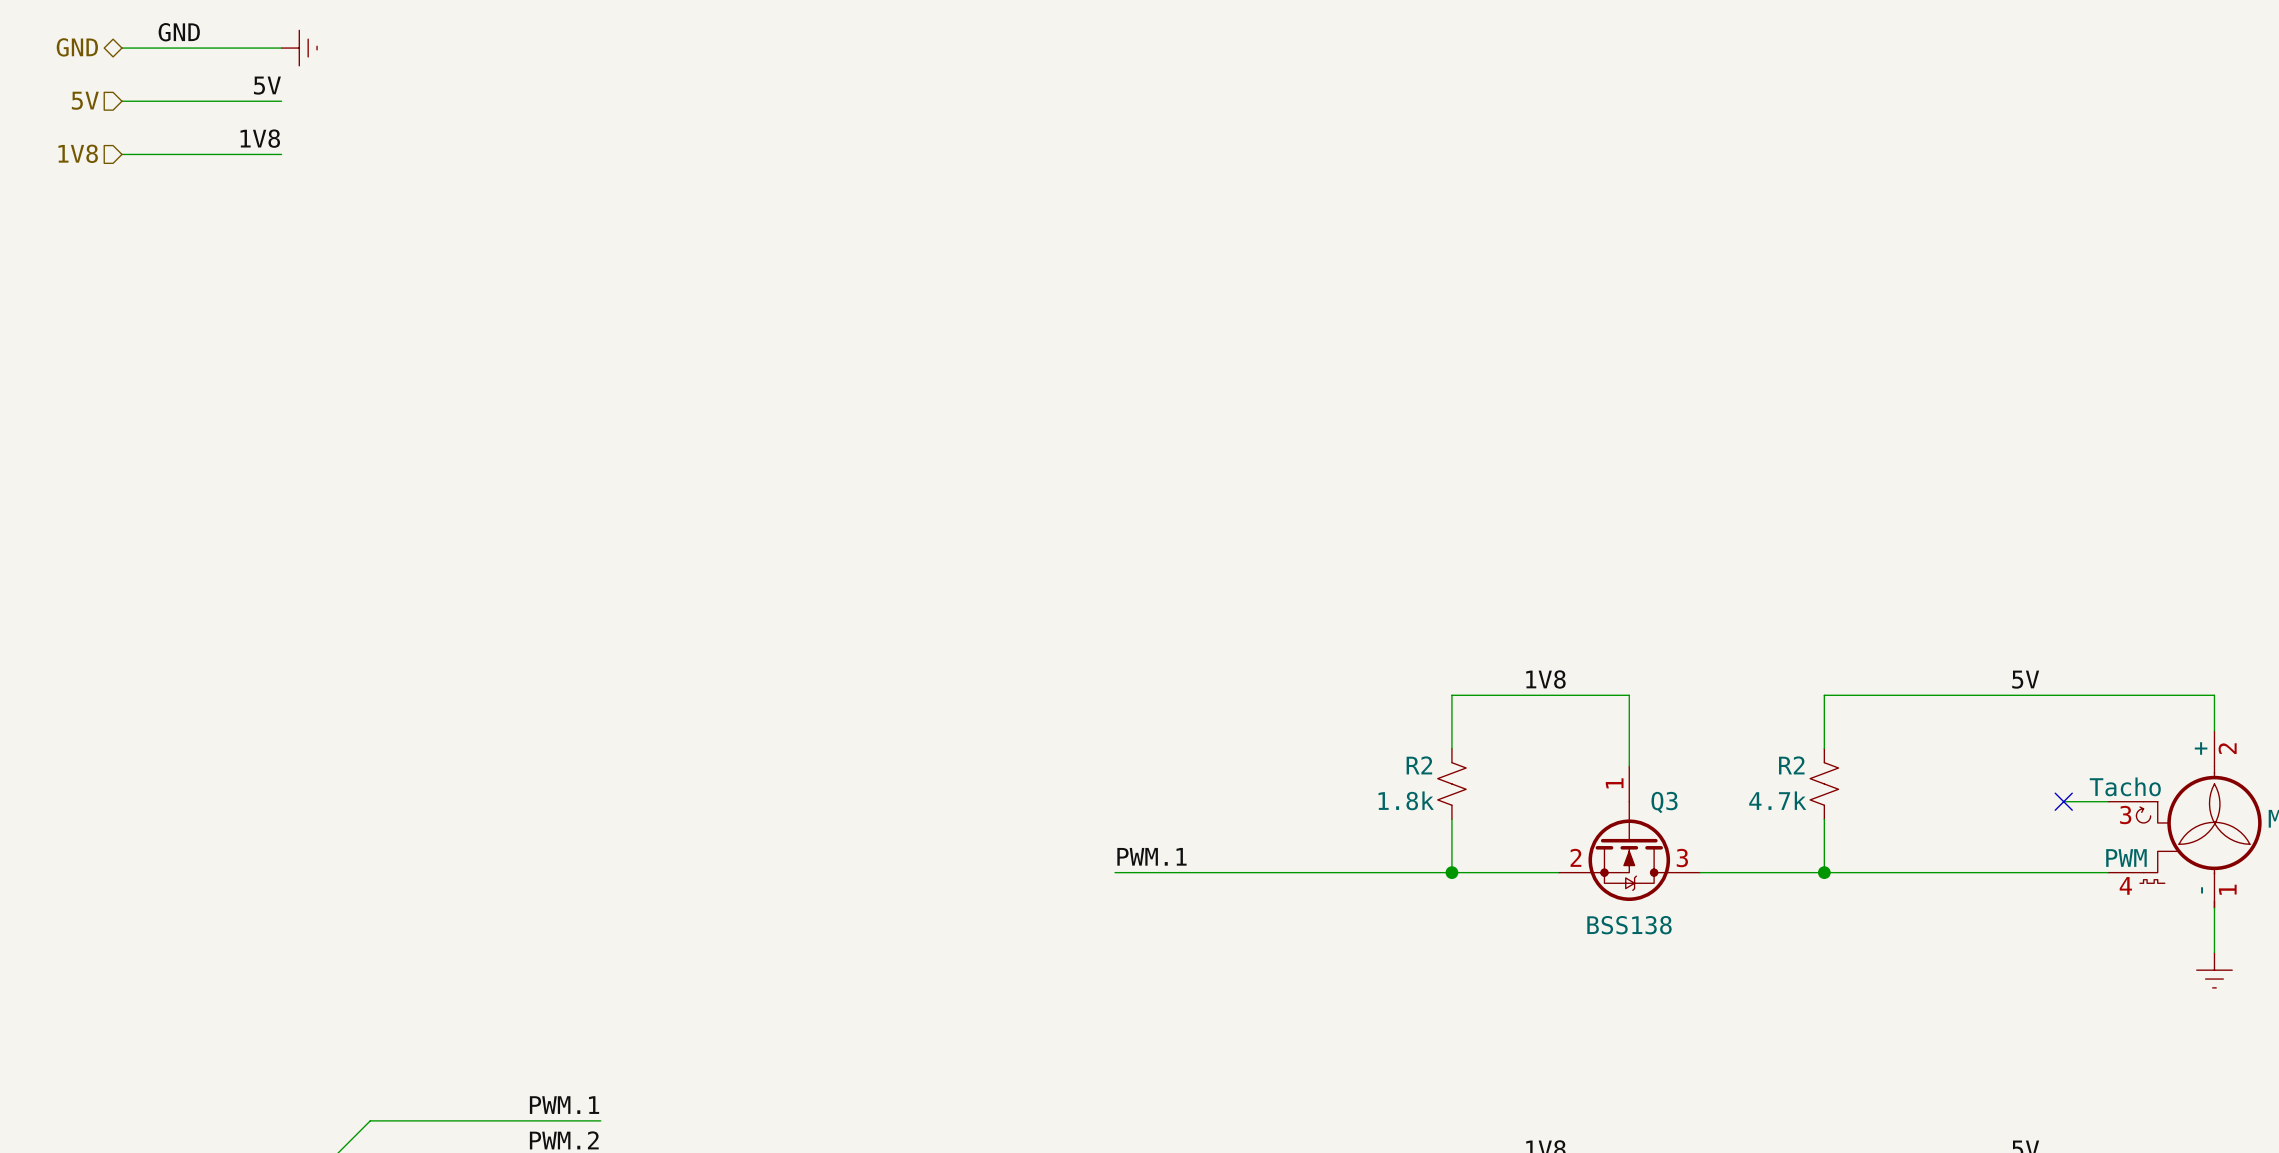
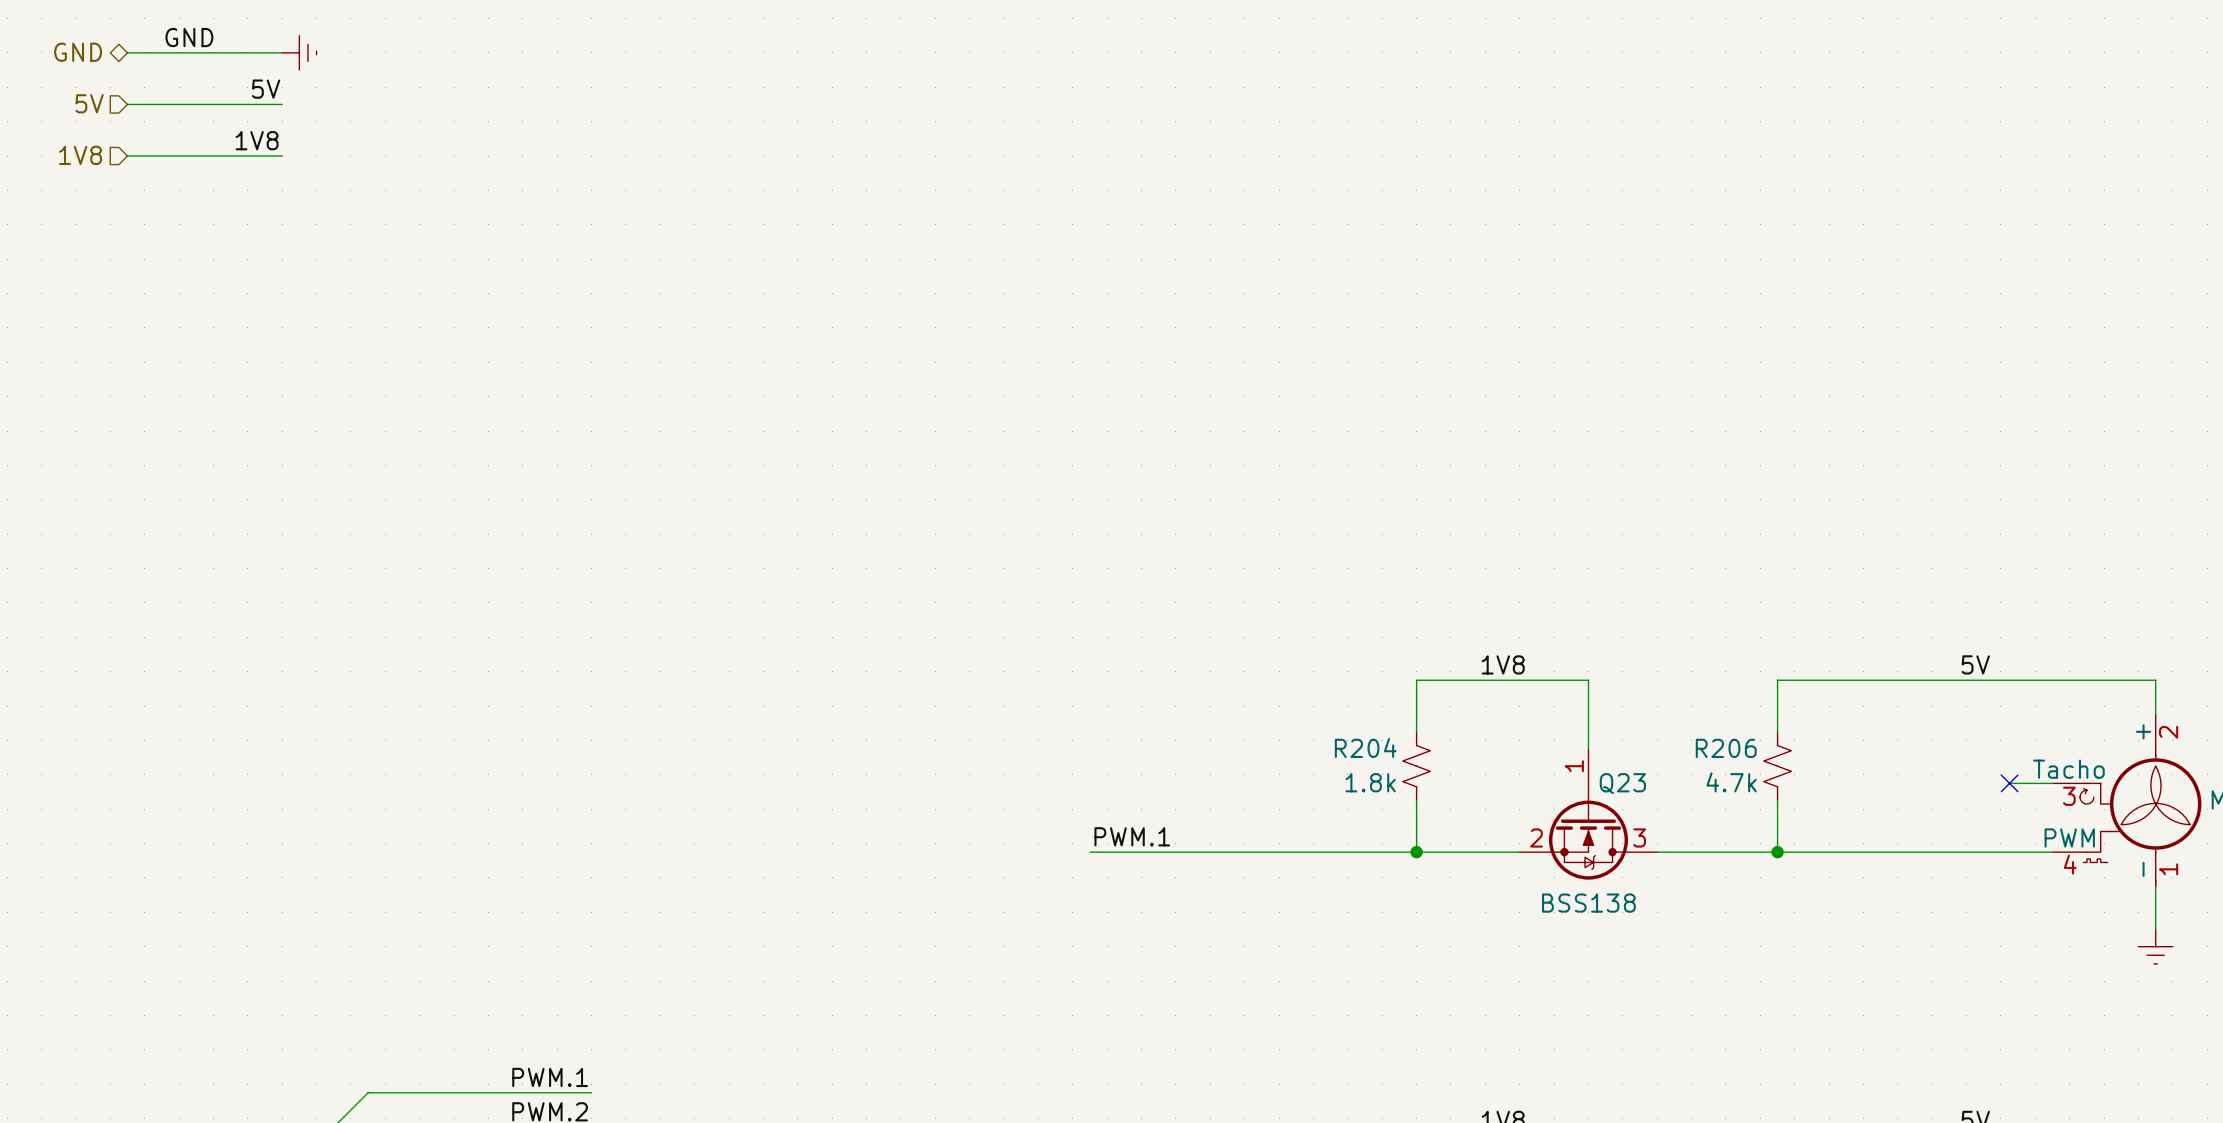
R2 name: R2 (1419, 765) -> R204 (1365, 747)
R2 name: R2 (1791, 765) -> R206 (1726, 748)
Q3 name: Q3 (1664, 802) -> Q23 (1622, 783)

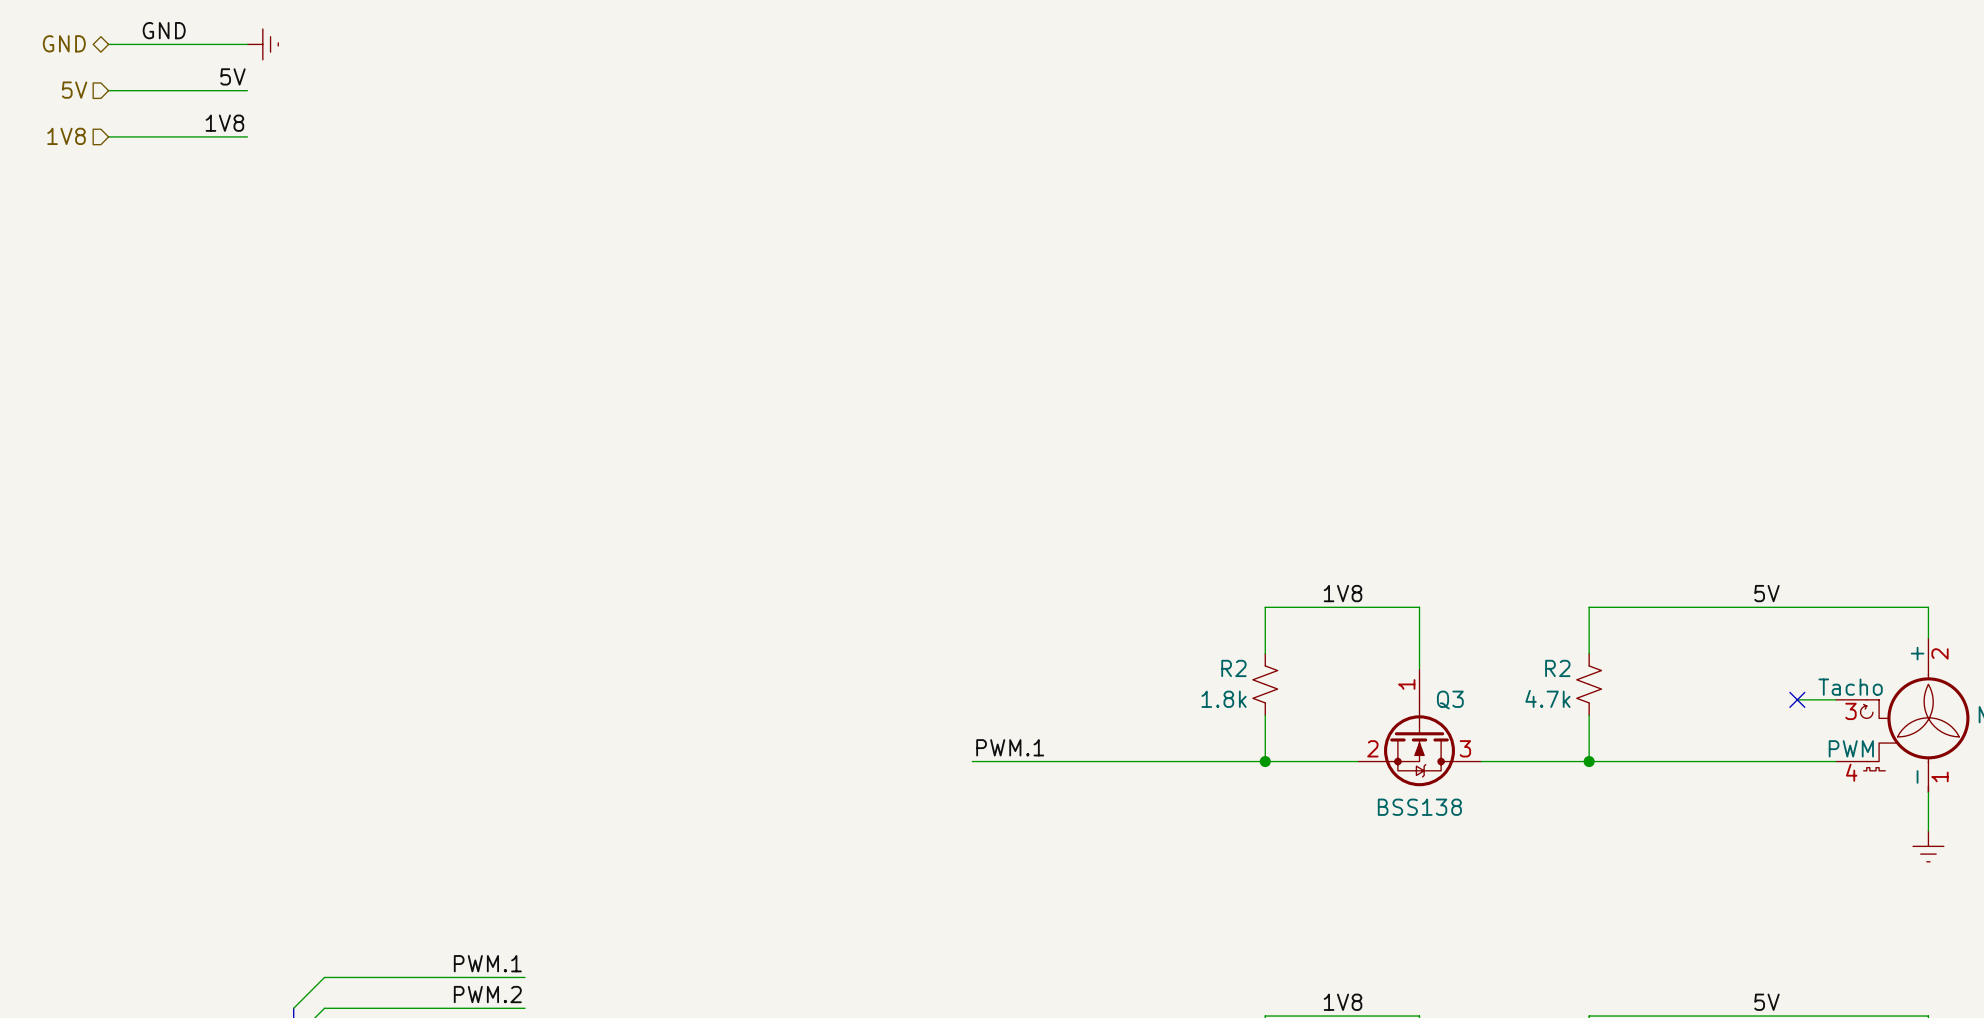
R204 name: R204 (1365, 747) -> R2 (1233, 668)
R206 name: R206 (1726, 748) -> R2 (1557, 668)
Q23 name: Q23 (1622, 783) -> Q3 (1450, 700)

